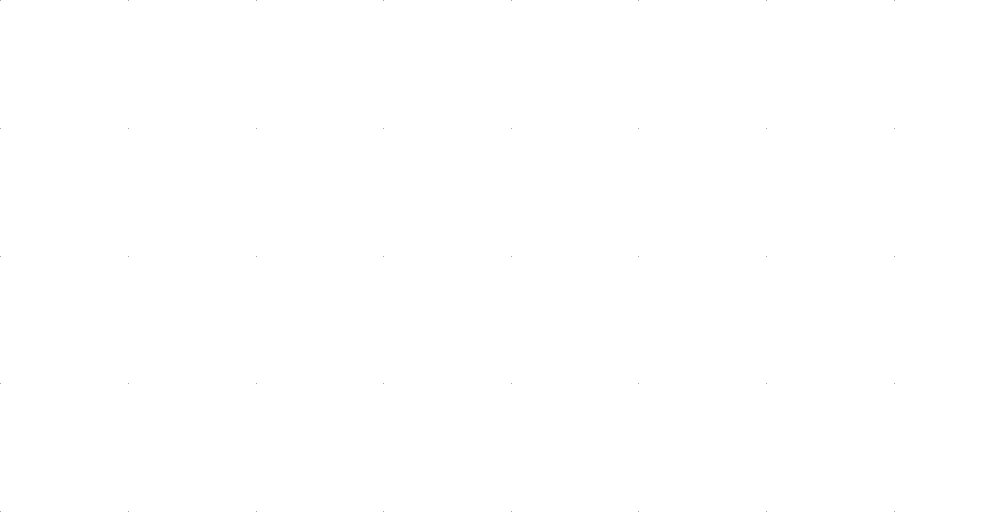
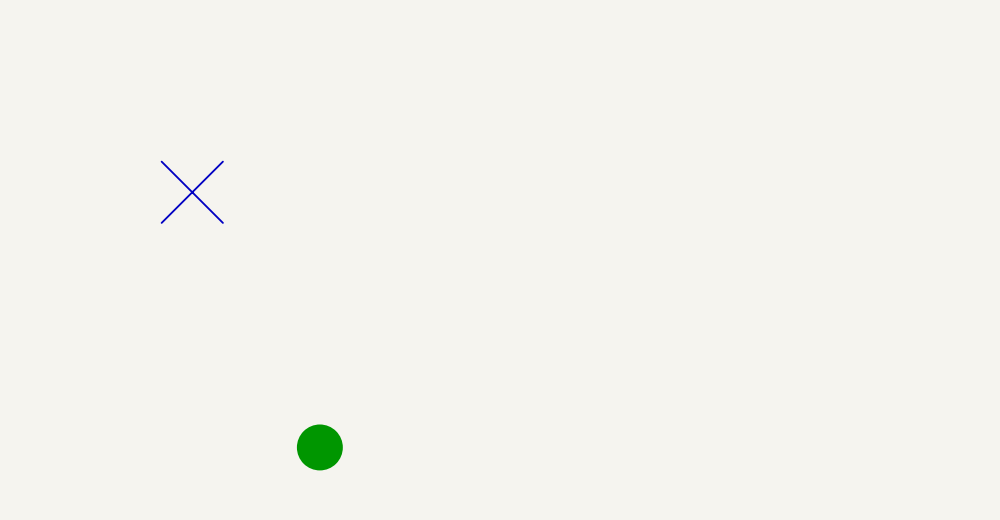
no-connect mark: none -> (192, 192)
junction: none -> (319, 447)

